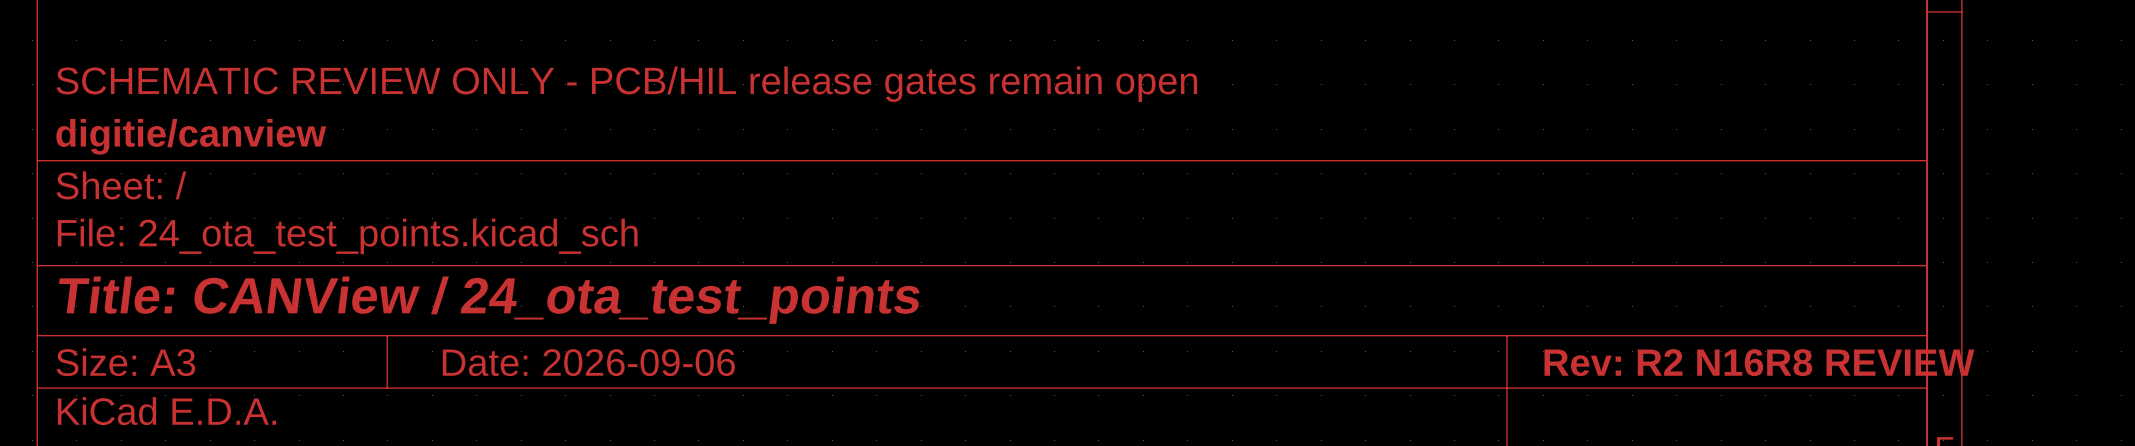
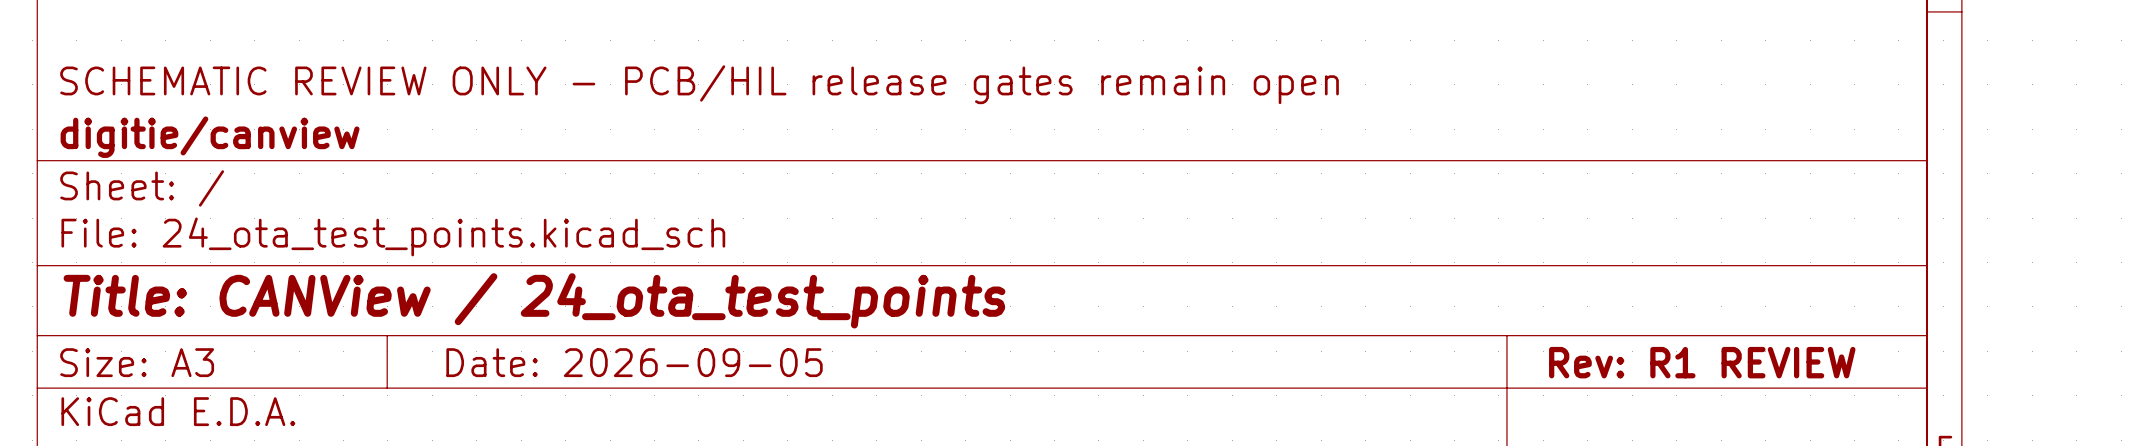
title block: Date: 2026-09-06 (588, 362) -> Date: 2026-09-05 (634, 362)
title block: Rev: R2 N16R8 REVIEW (1759, 362) -> Rev: R1 REVIEW (1702, 362)

